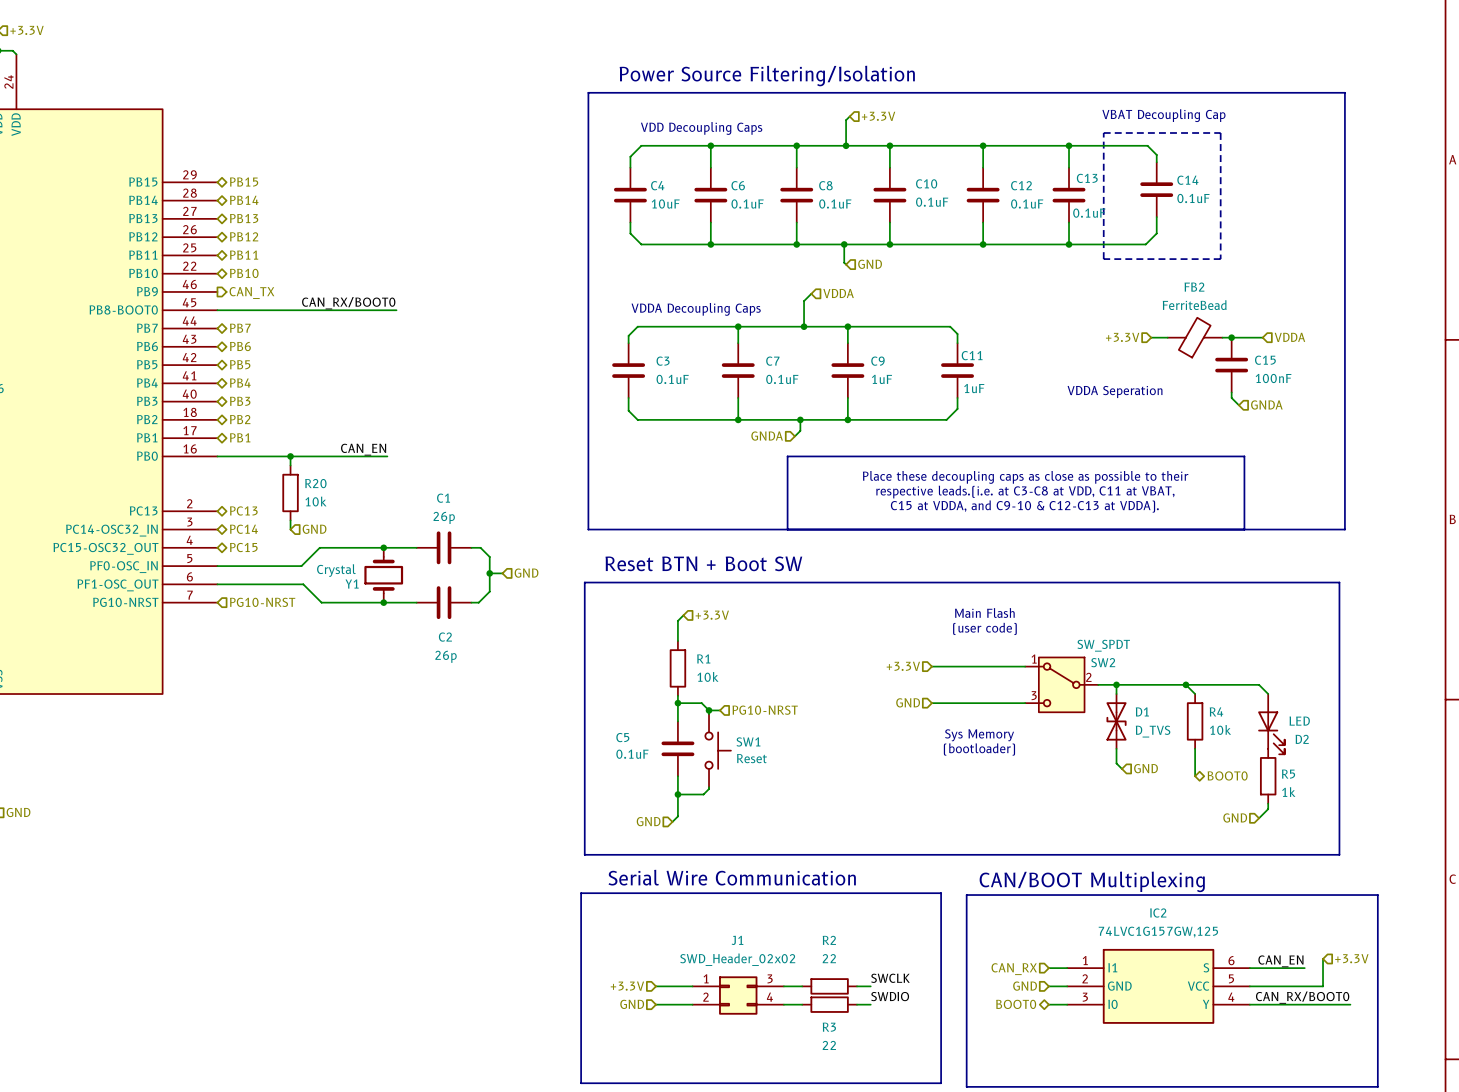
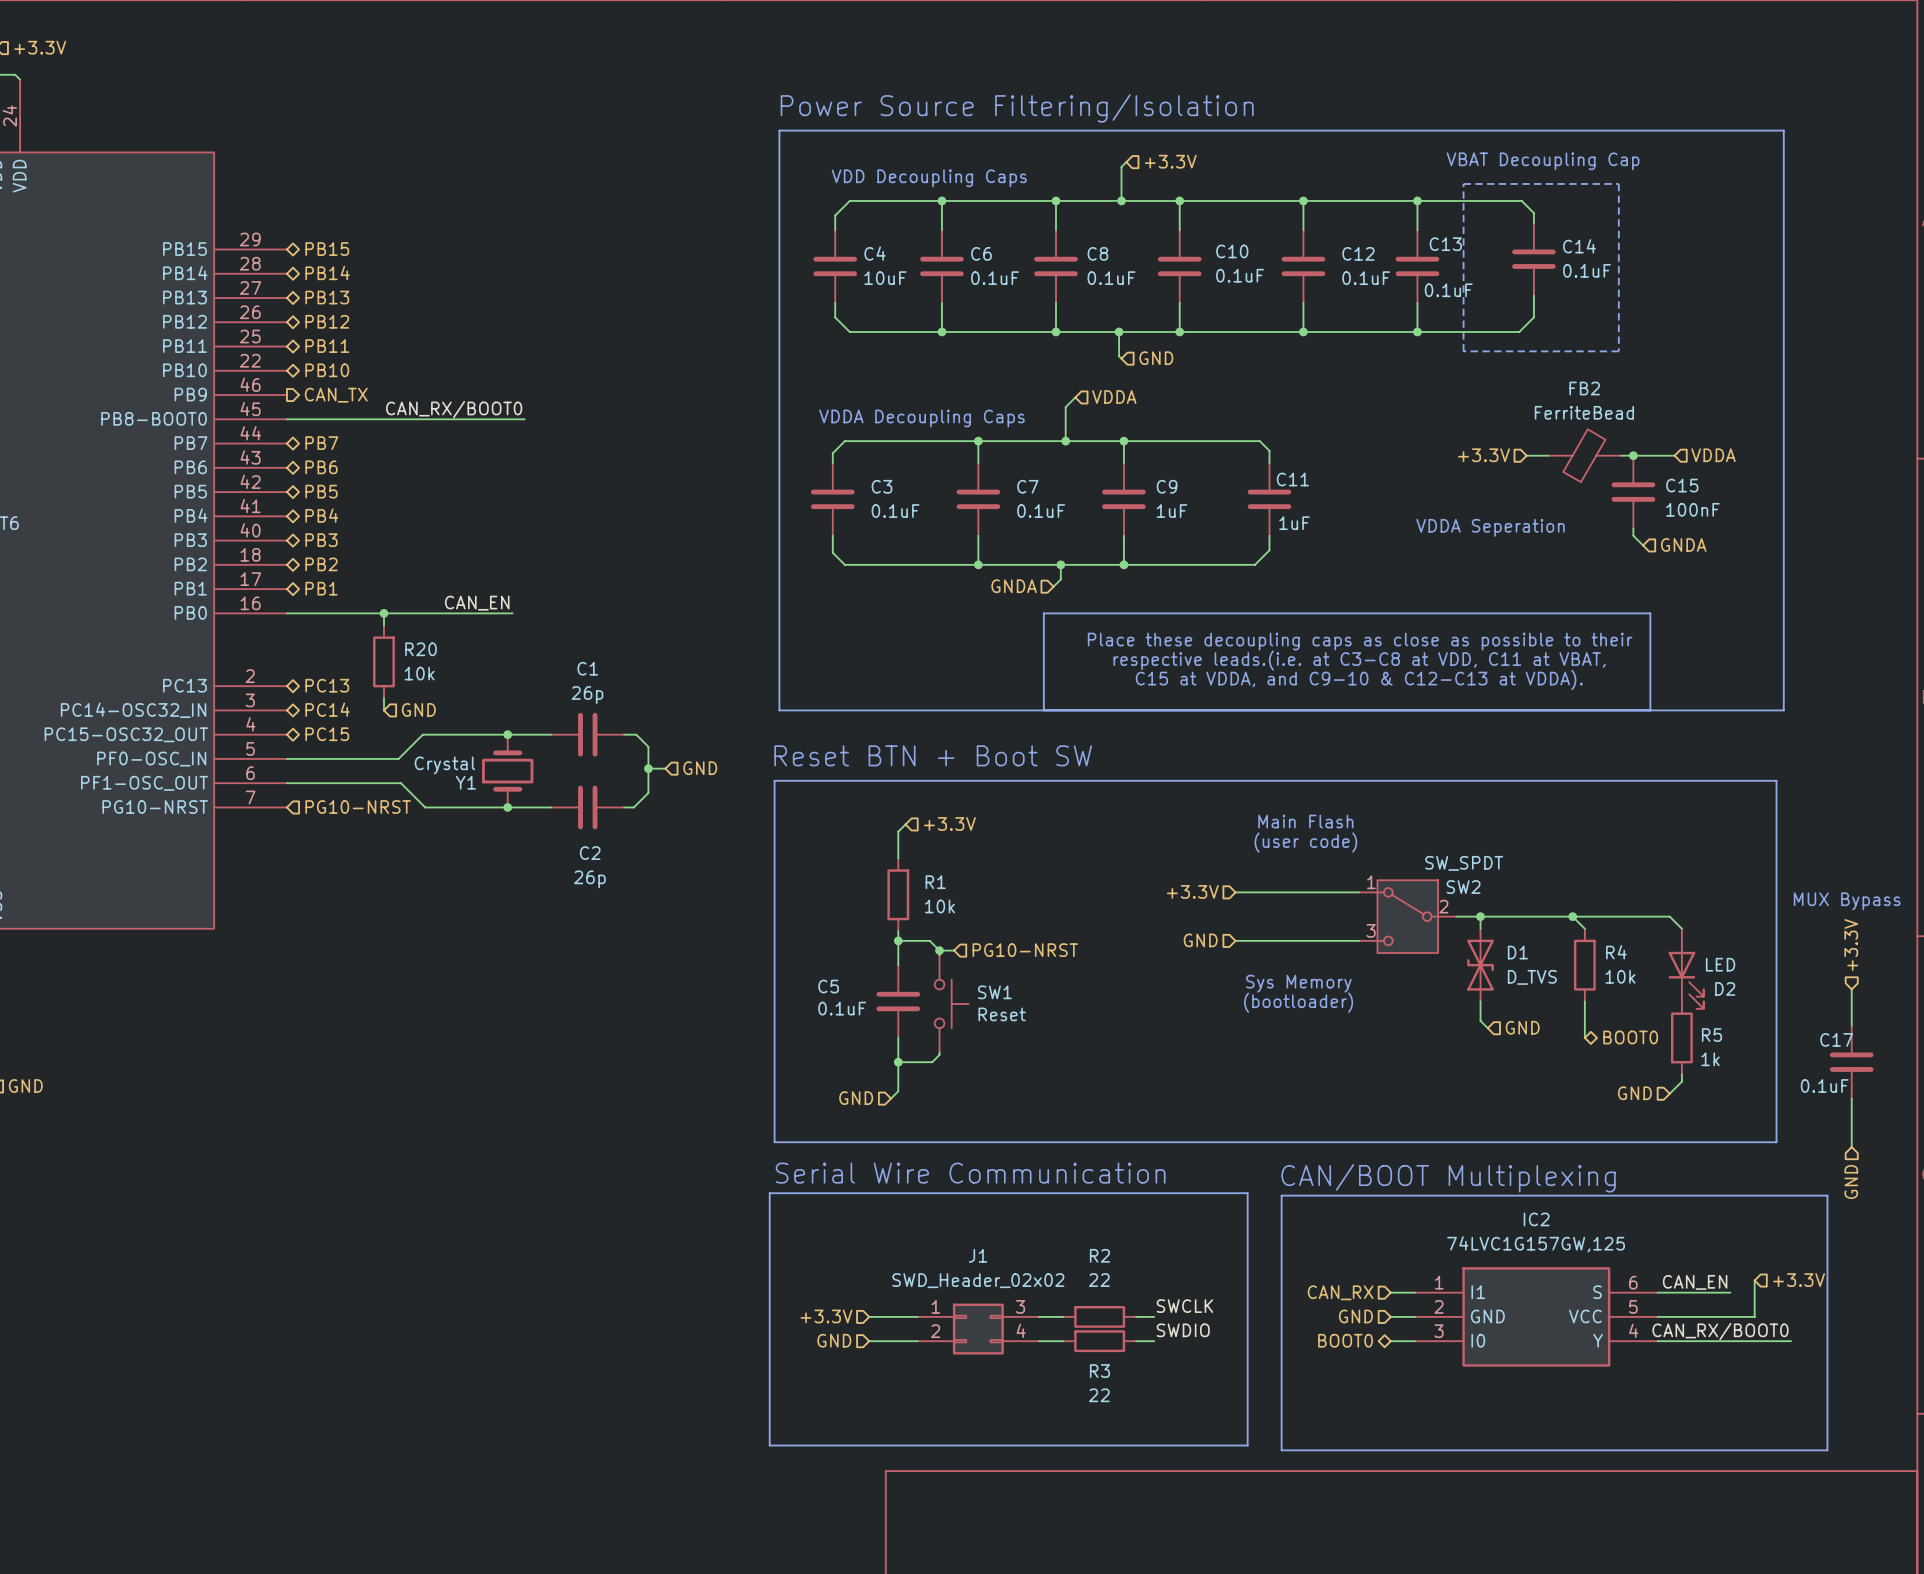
text: none -> MUX Bypass (1847, 901)
hierarchical label: none -> +3.3V (1851, 945)
wire: none -> (1851, 989) (1851, 1025)
C17: none -> 0.1uF (1851, 1062)
wire: none -> (1851, 1098) (1851, 1147)
hierarchical label: none -> GND (1851, 1181)

